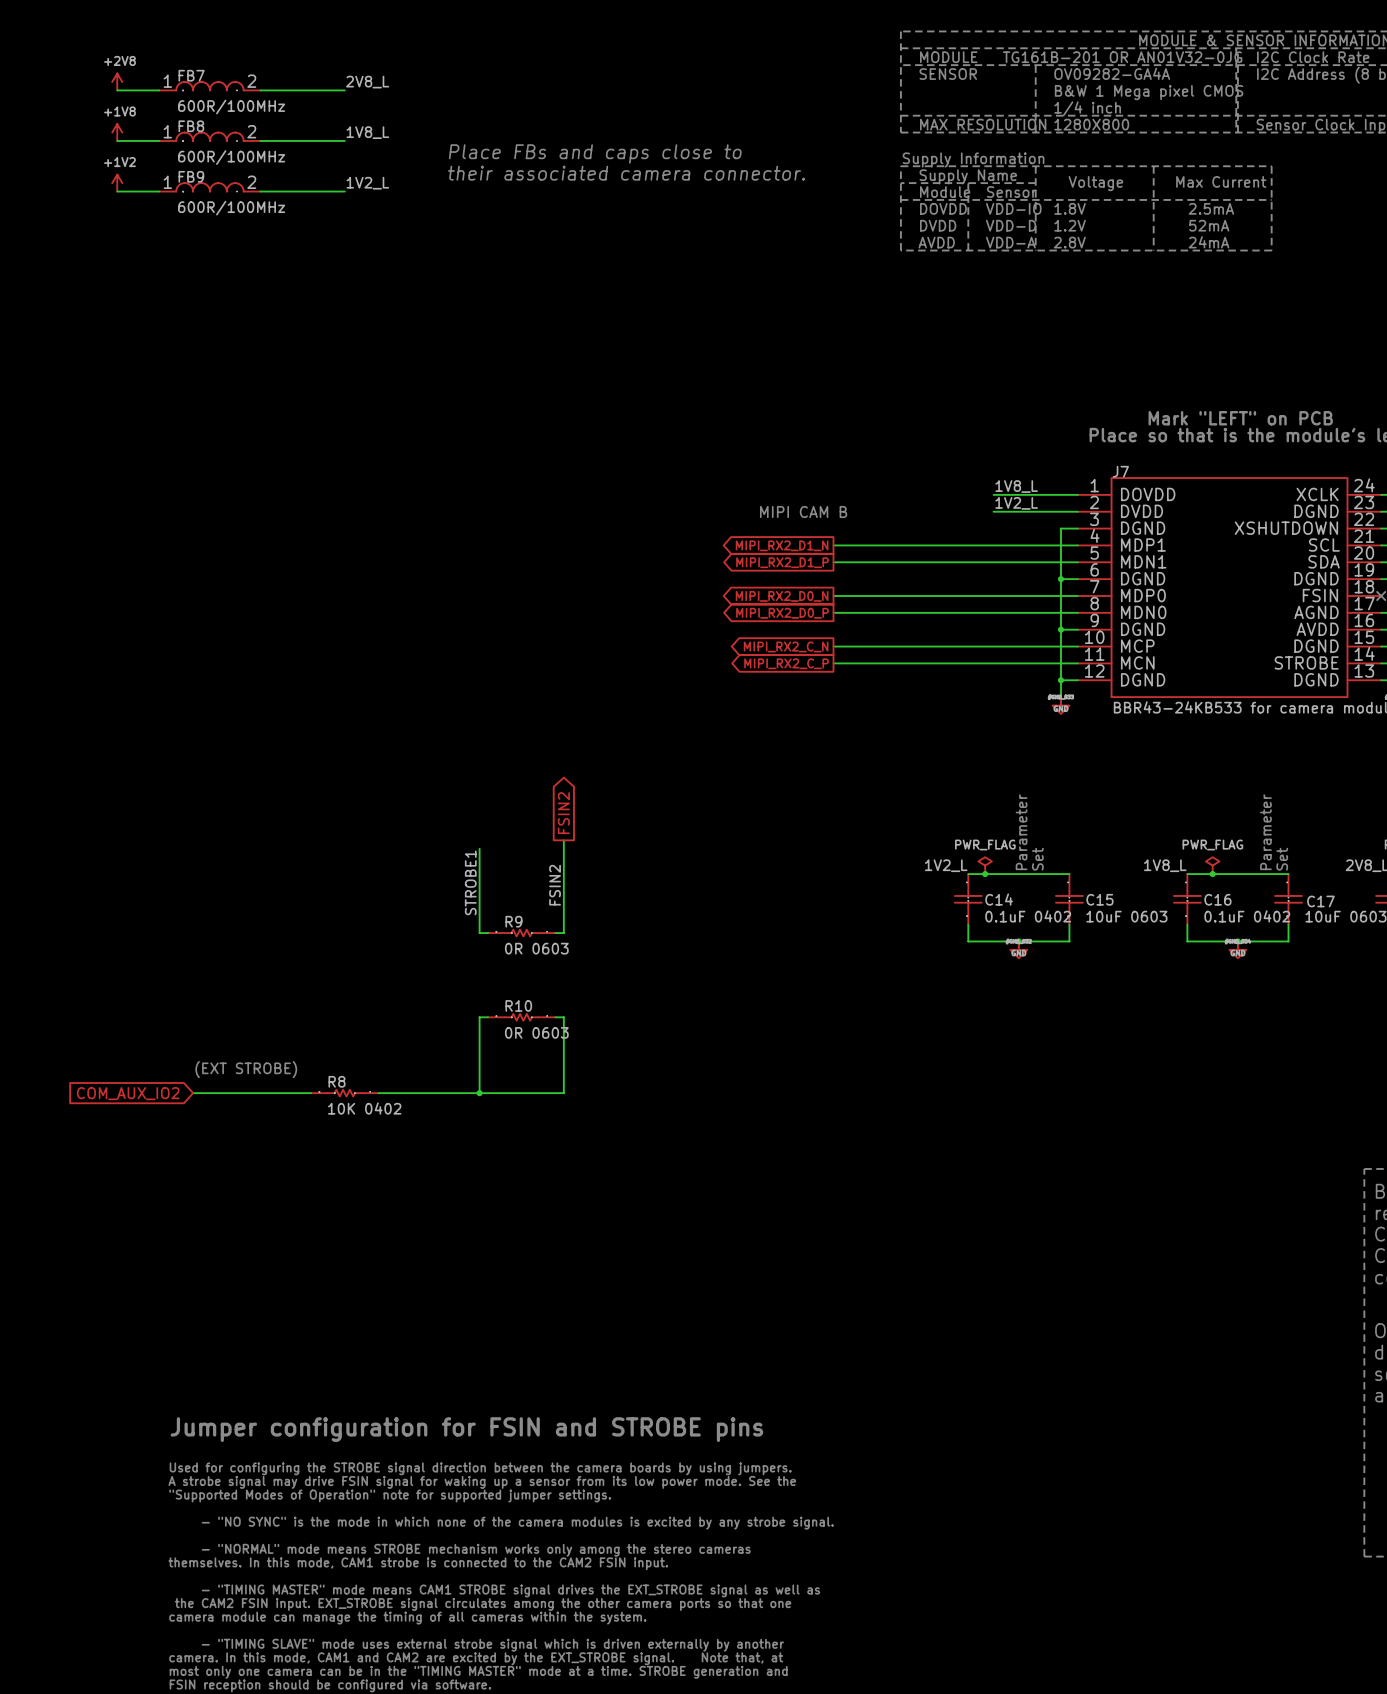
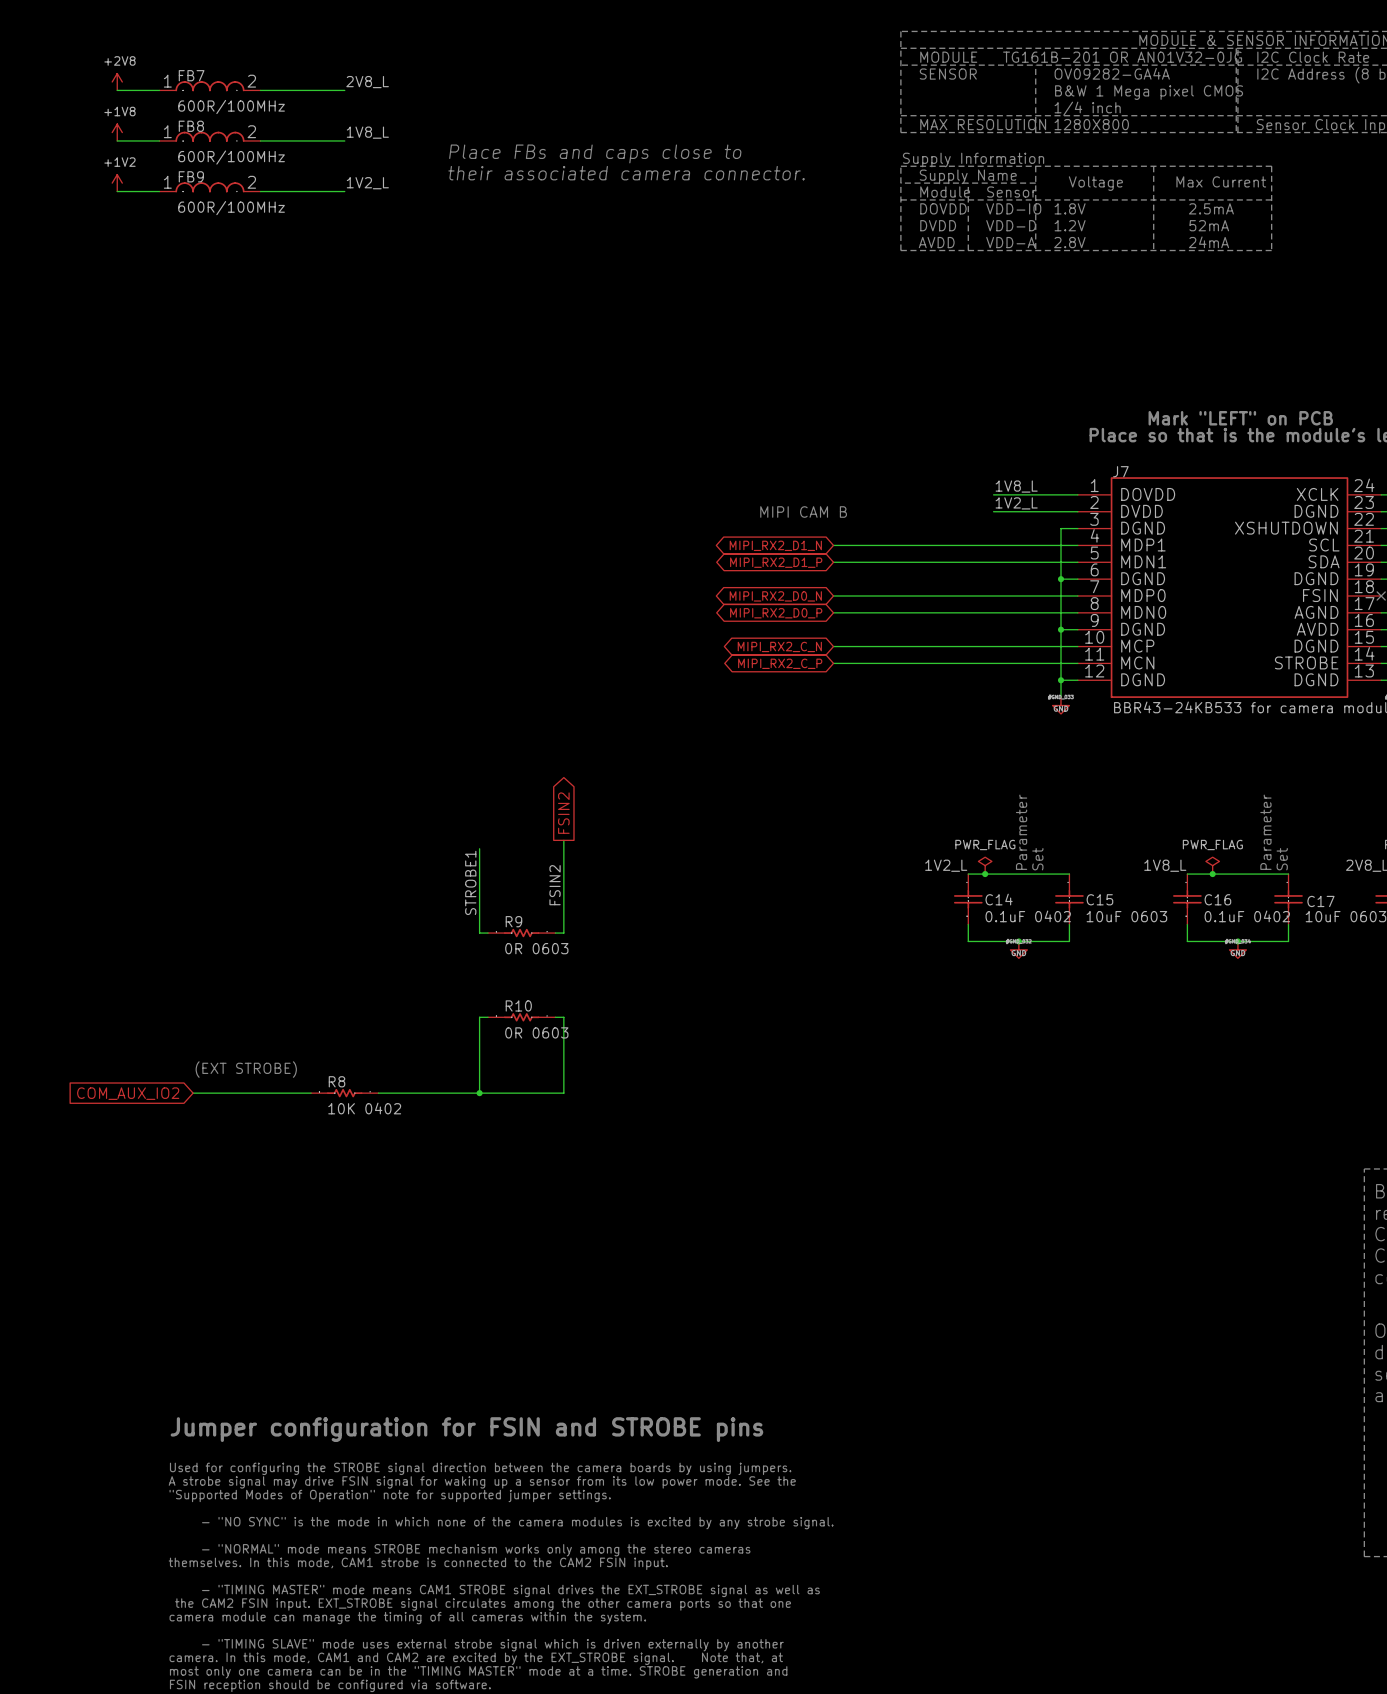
global label shape: output (782, 545) -> bidirectional (775, 545)
global label shape: output (782, 562) -> bidirectional (776, 562)
global label shape: output (782, 596) -> bidirectional (775, 596)
global label shape: output (782, 613) -> bidirectional (776, 613)
global label shape: output (786, 646) -> bidirectional (779, 646)
global label shape: output (786, 663) -> bidirectional (780, 663)

